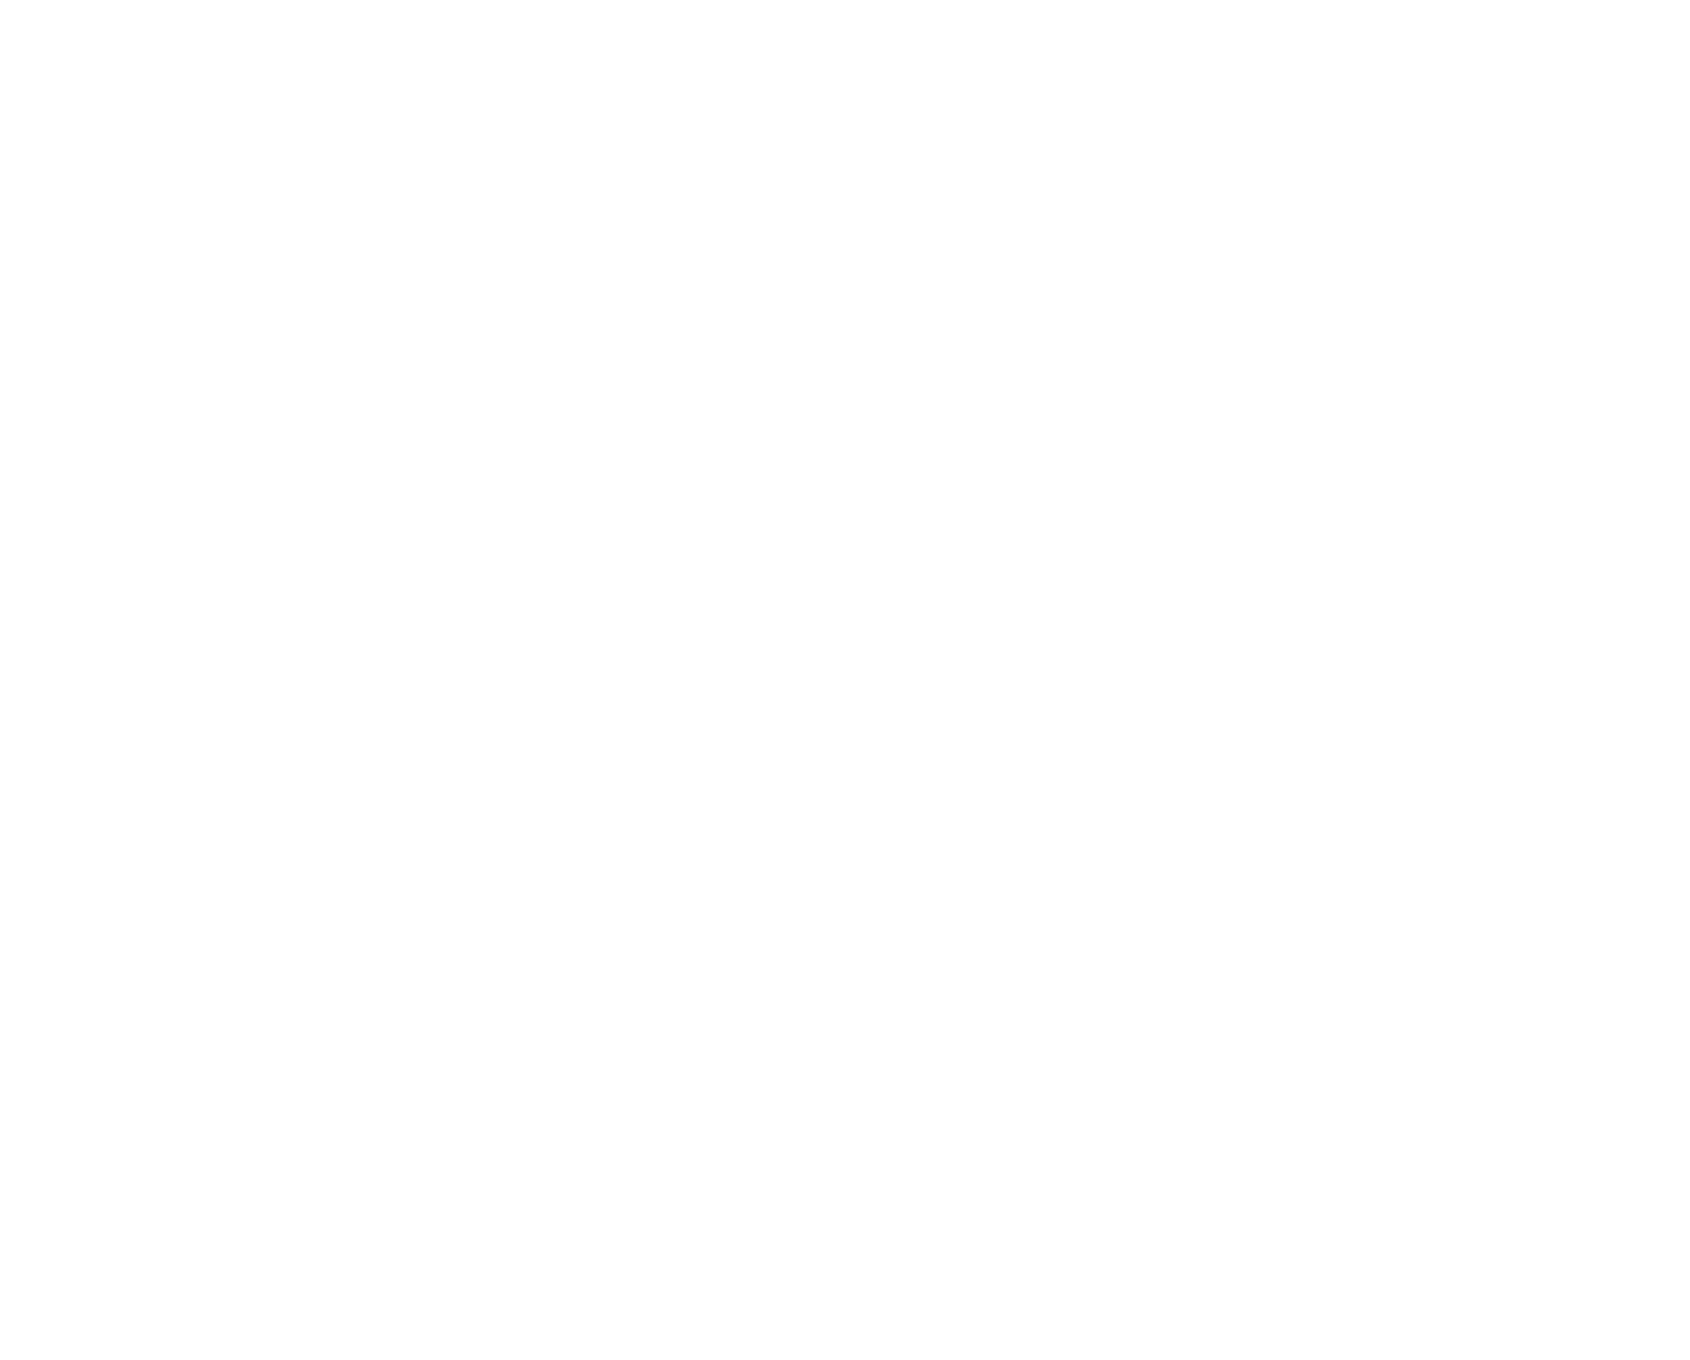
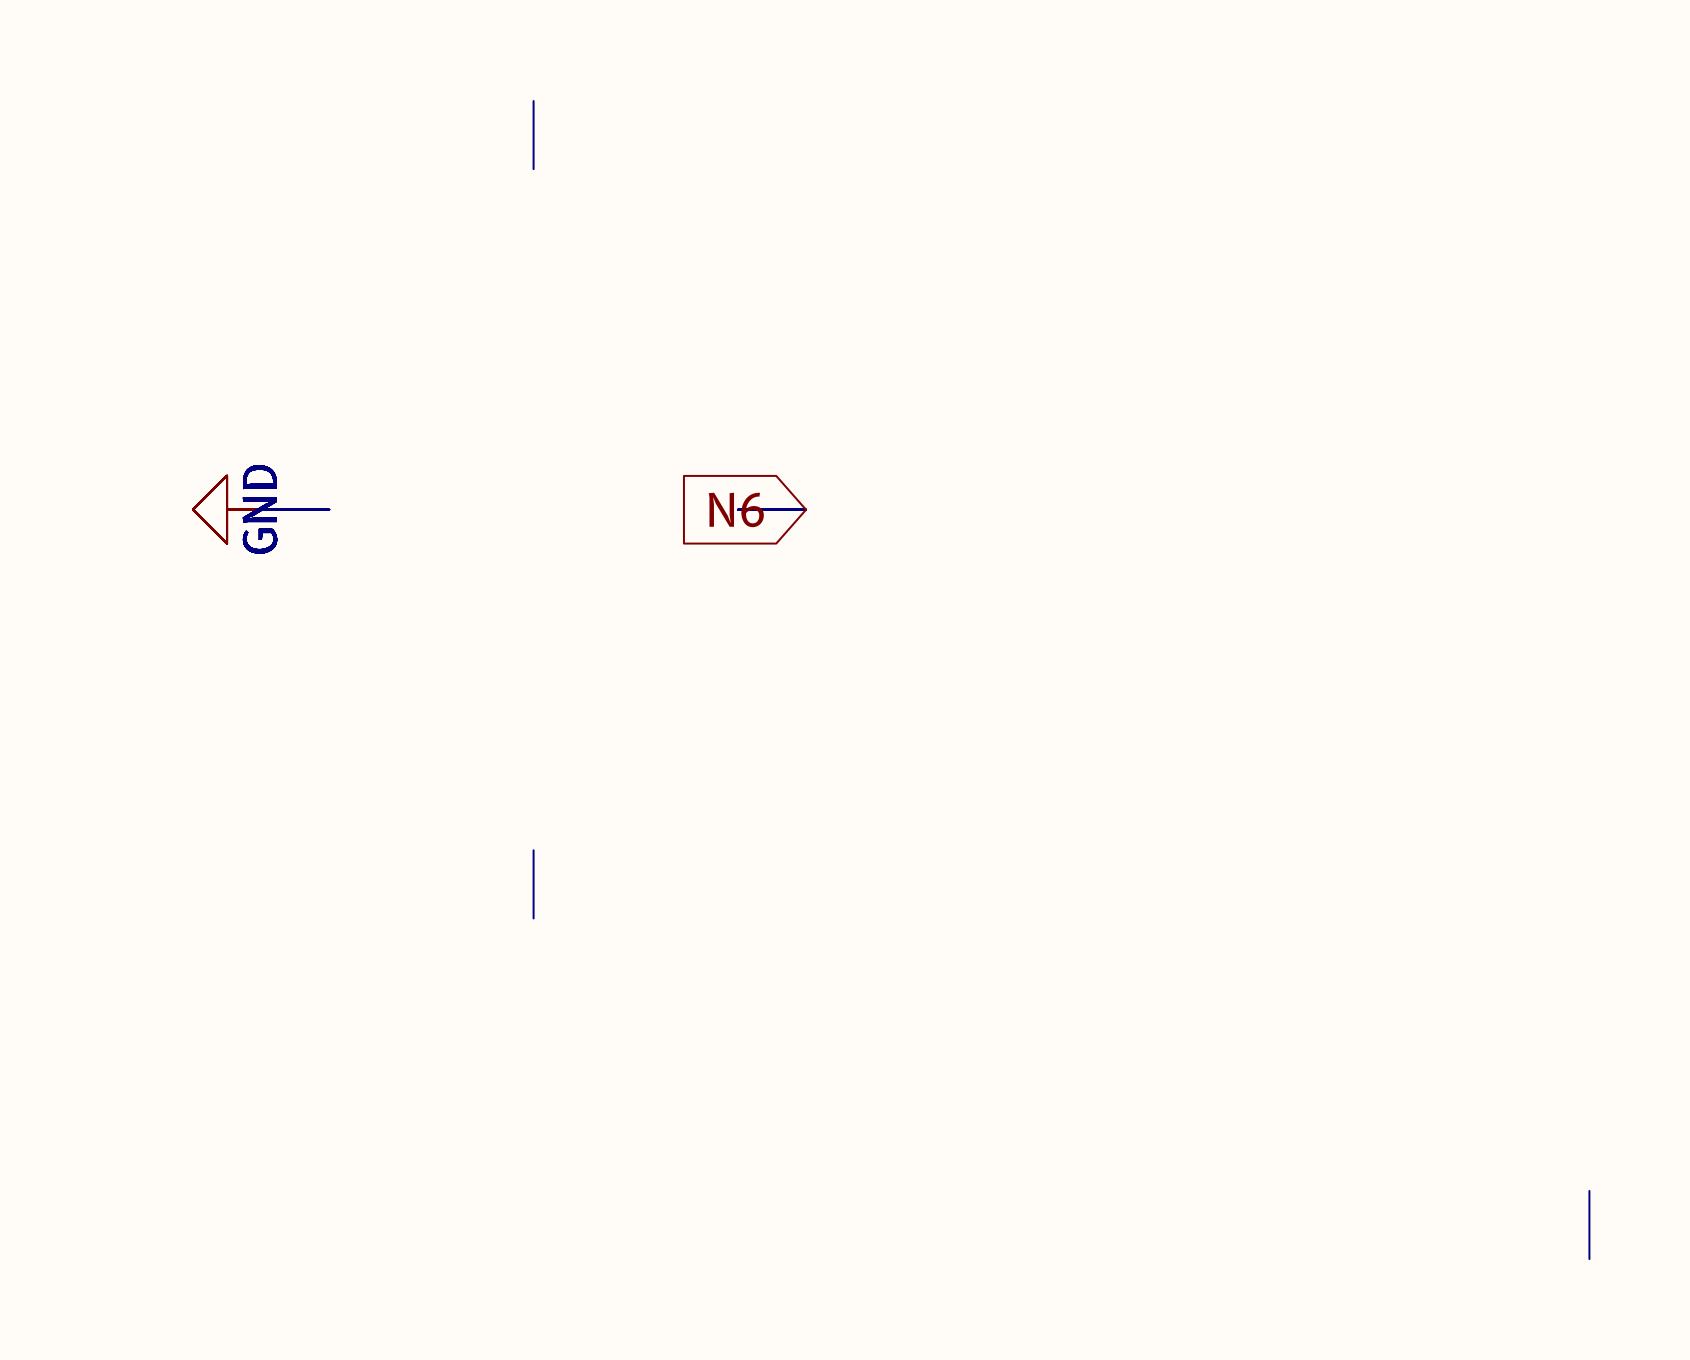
wire: none -> (533, 101) (533, 169)
power symbol: none -> GND (227, 509)
wire: none -> (261, 509) (329, 509)
wire: none -> (737, 509) (806, 509)
global label: none -> N6 (736, 509)
wire: none -> (533, 850) (533, 918)
wire: none -> (1589, 1190) (1589, 1259)

